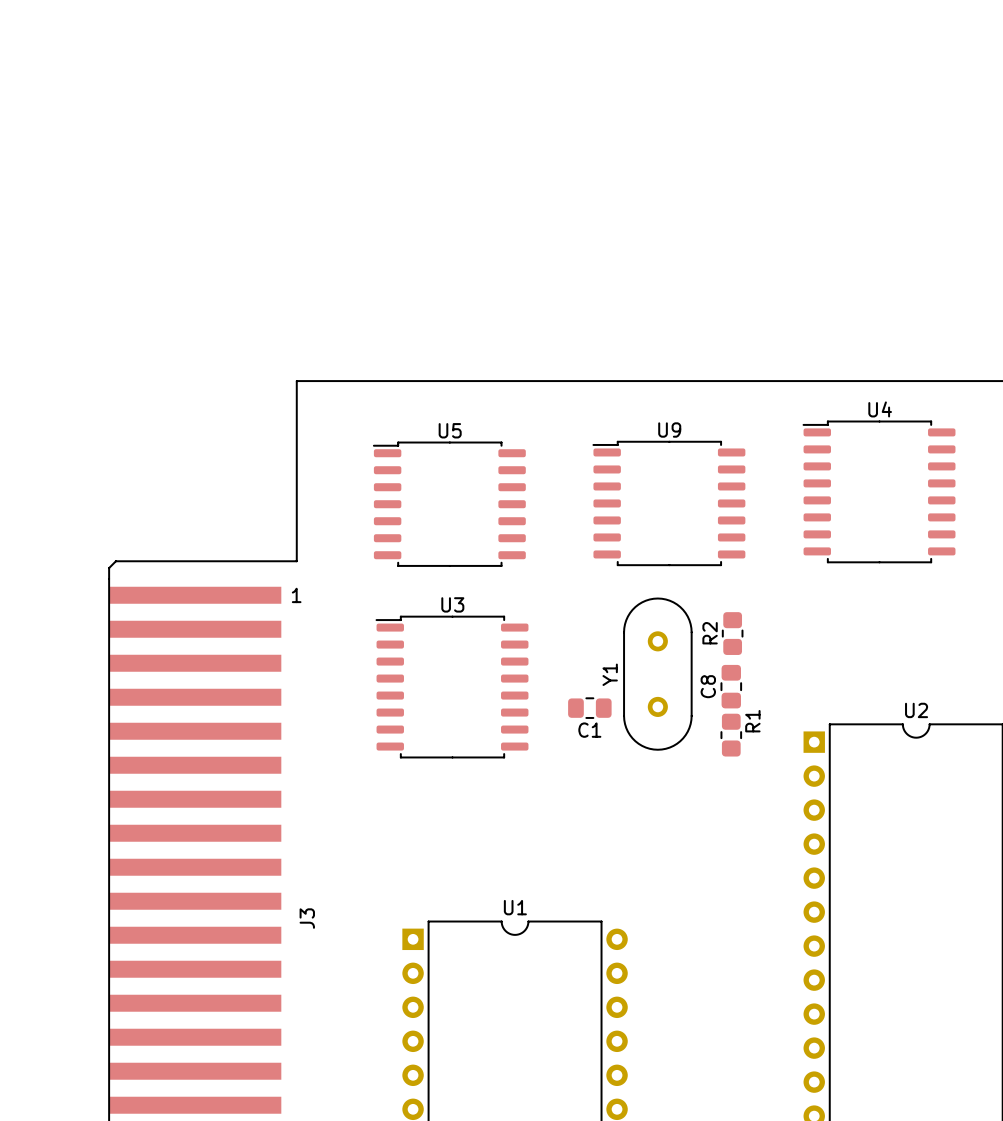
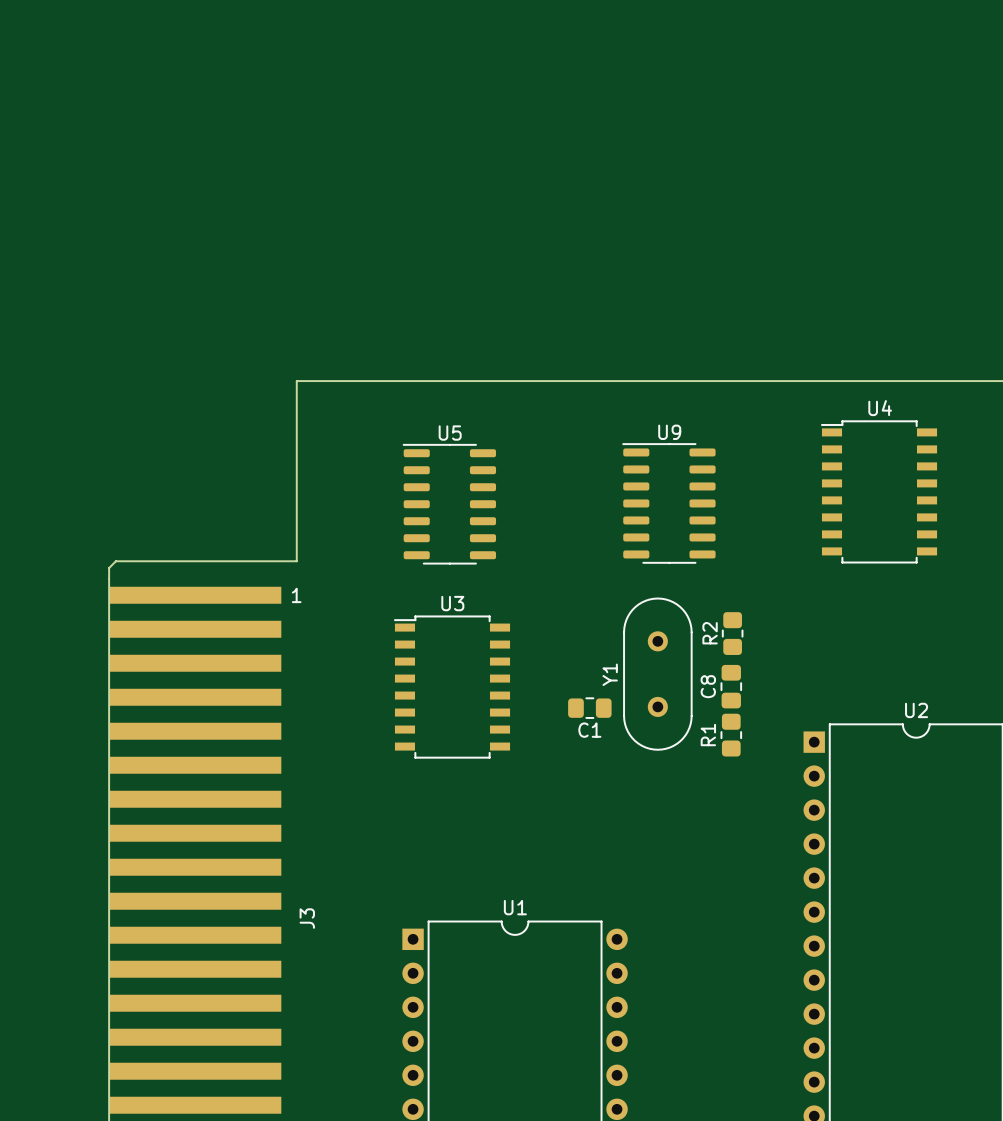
U4 footprint: [802, 420, 956, 564] -> [820, 420, 938, 564]
U9 footprint: [592, 440, 746, 566] -> [622, 443, 716, 564]
U5 footprint: [373, 441, 526, 567] -> [402, 444, 497, 565]
U3 footprint: [375, 615, 529, 759] -> [393, 615, 511, 759]
R1 name position: R1 (752, 721) -> R1 (708, 735)

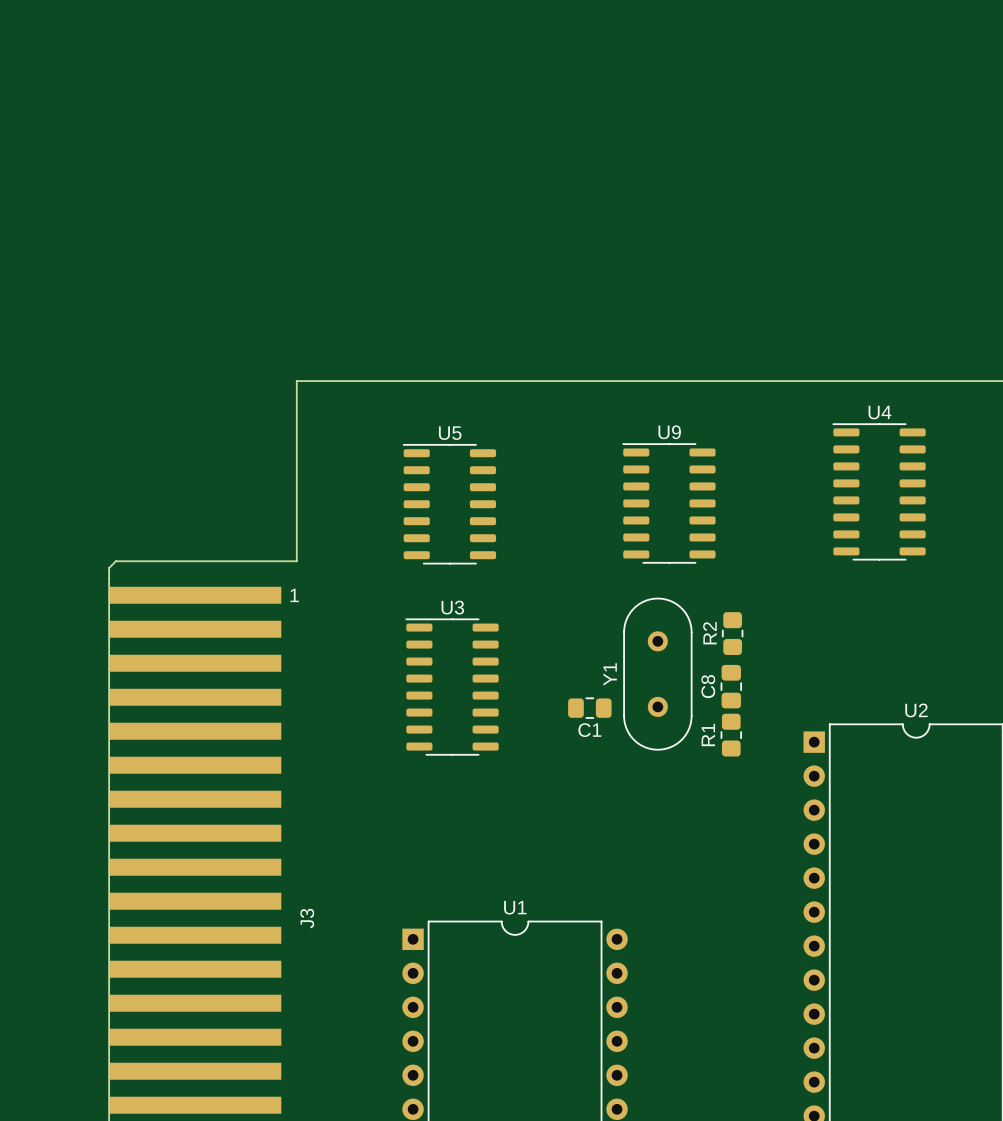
U4 footprint: [820, 420, 938, 564] -> [832, 423, 926, 561]
U3 footprint: [393, 615, 511, 759] -> [405, 618, 499, 756]

